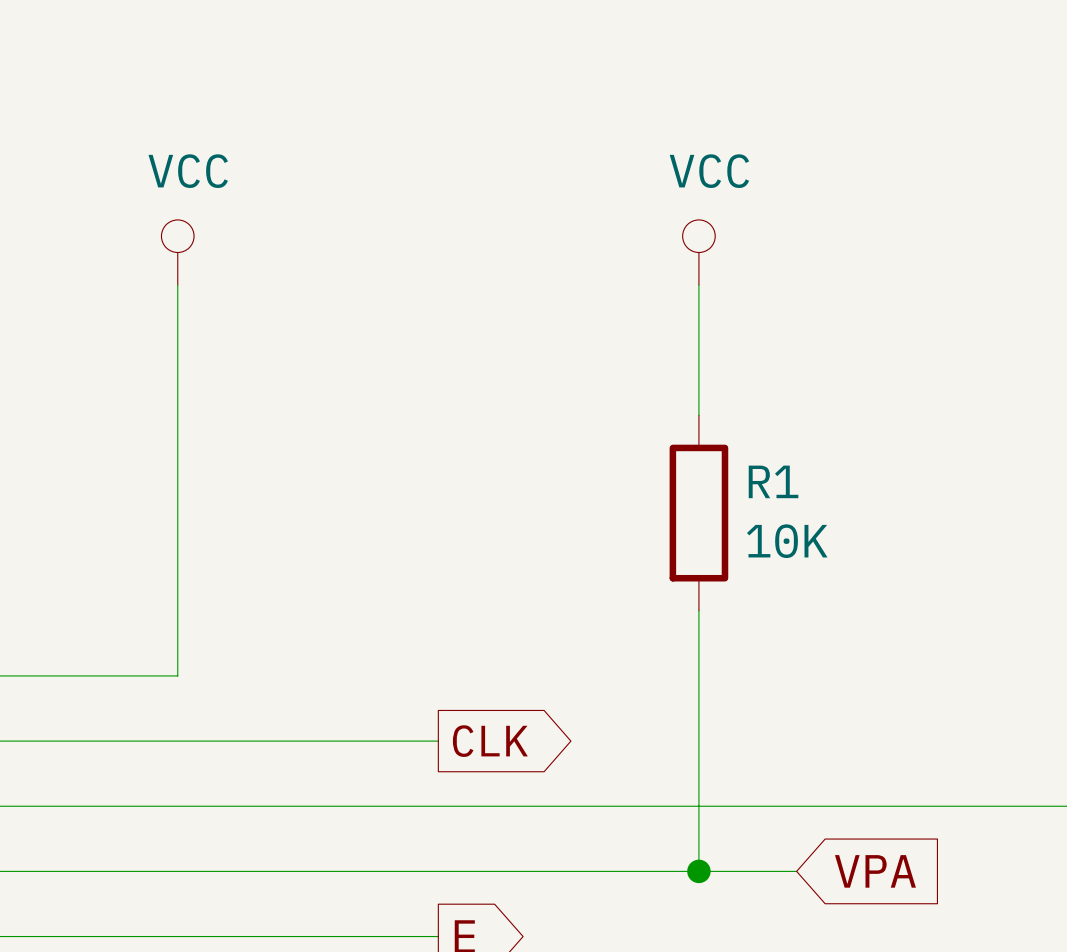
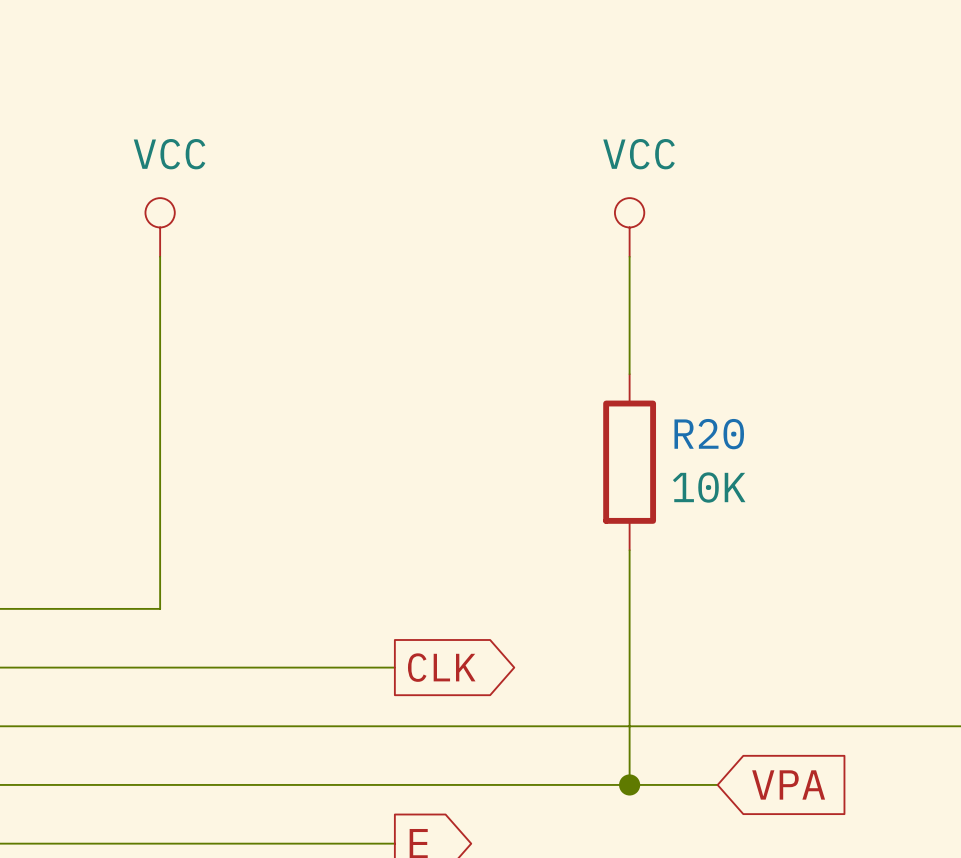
R1 name: R1 (773, 481) -> R20 (709, 434)

